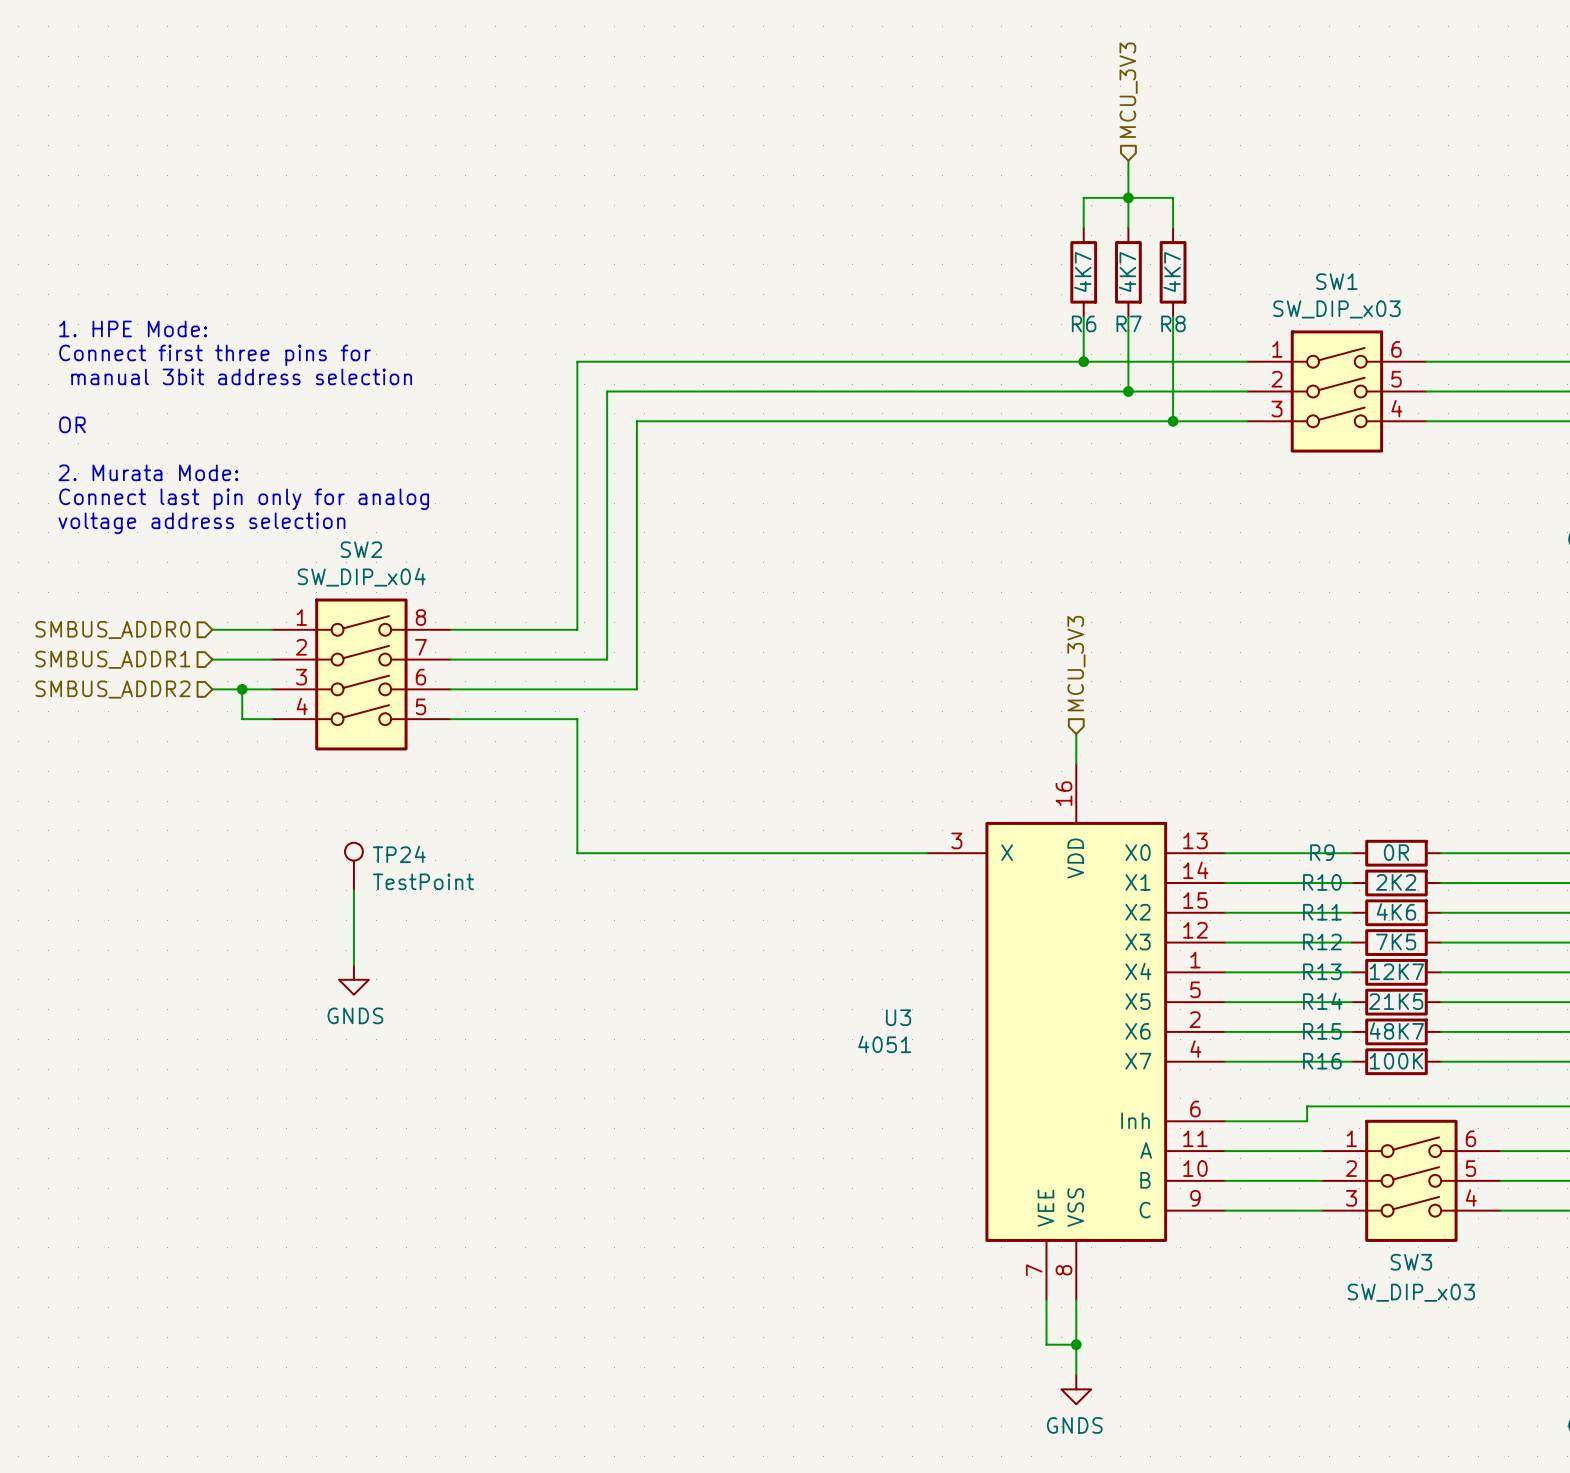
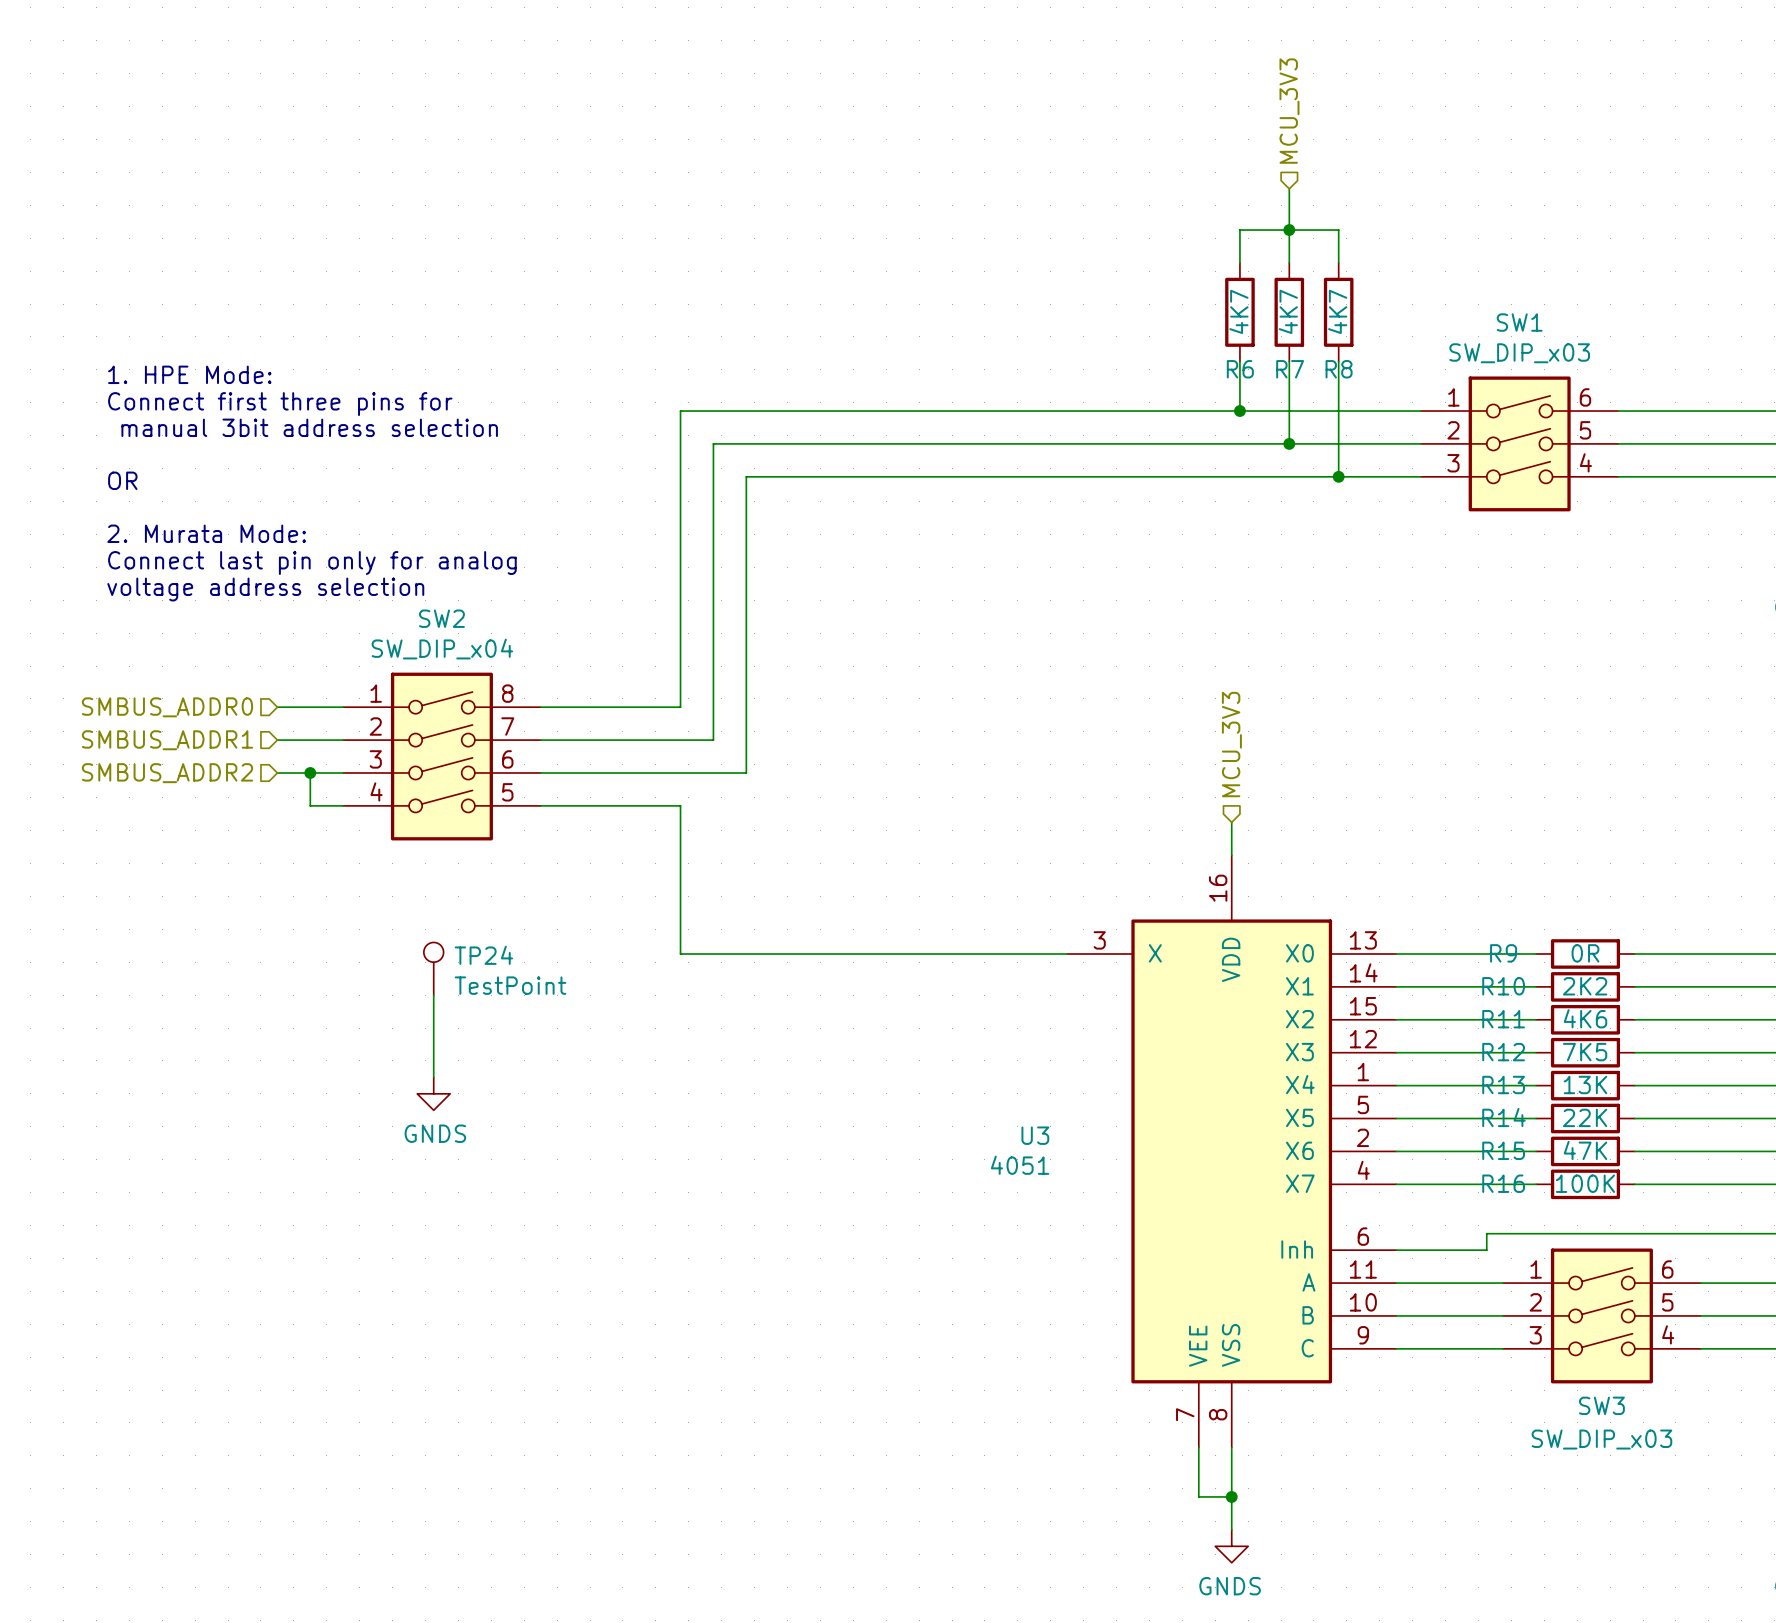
R13 value: 12K7 (1396, 971) -> 13K (1585, 1085)
R14 value: 21K5 (1396, 1001) -> 22K (1585, 1117)
R15 value: 48K7 (1396, 1031) -> 47K (1585, 1150)

